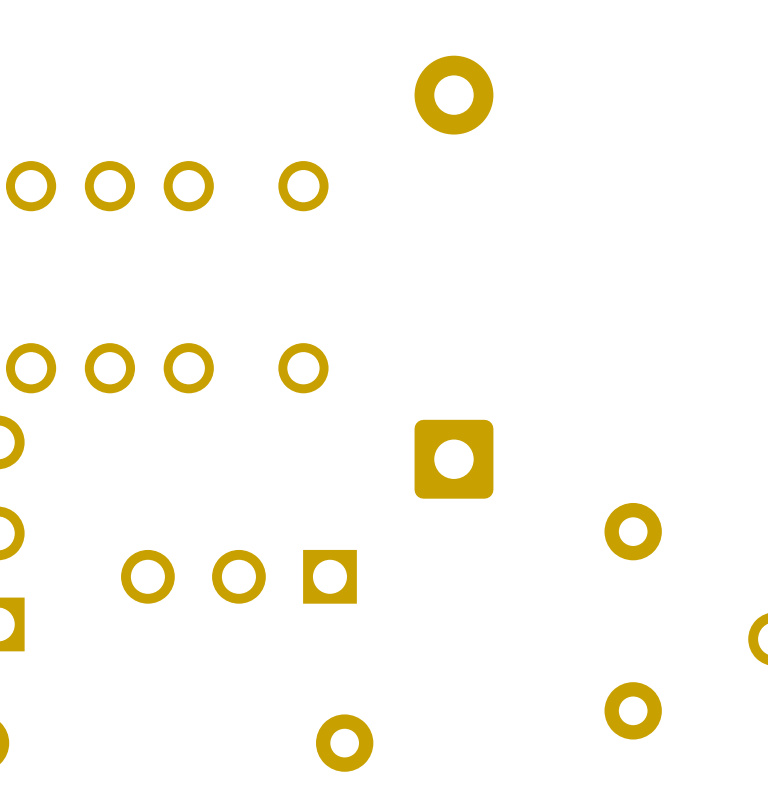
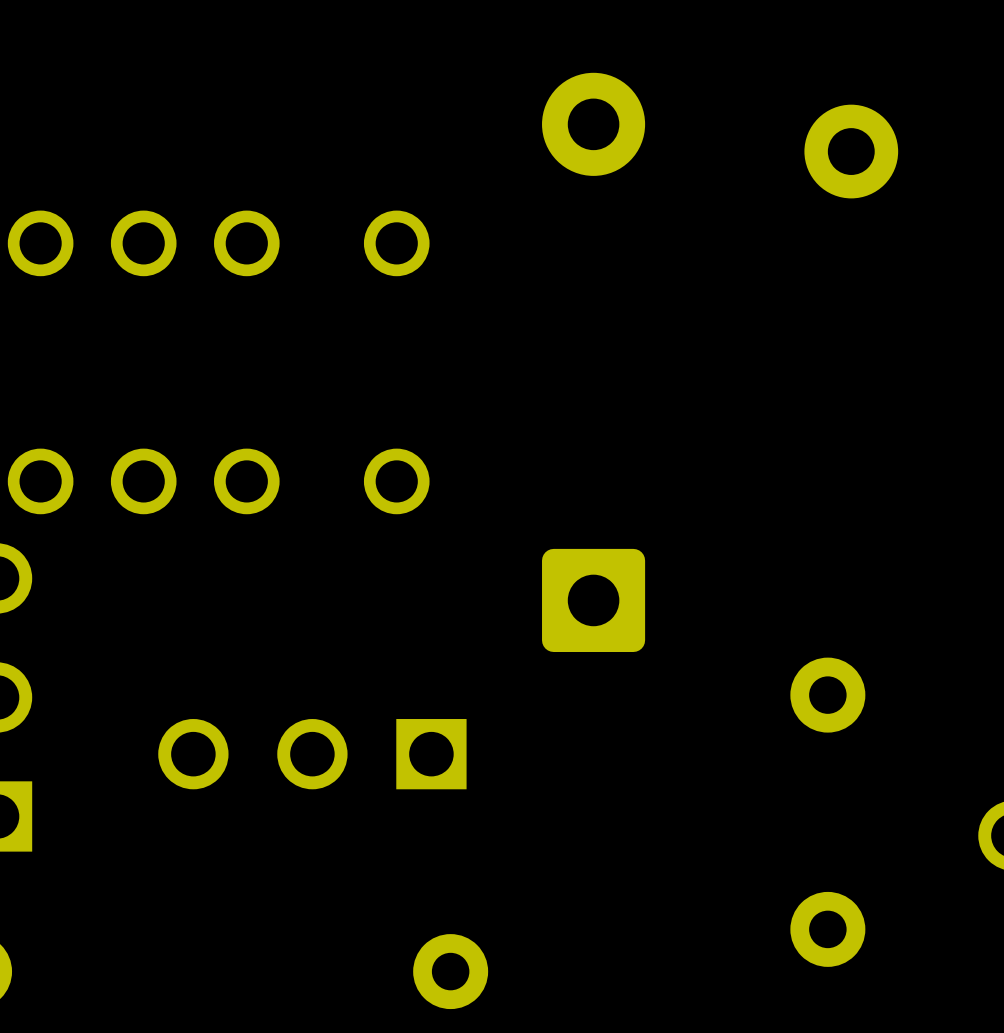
part: none -> (851, 151)

